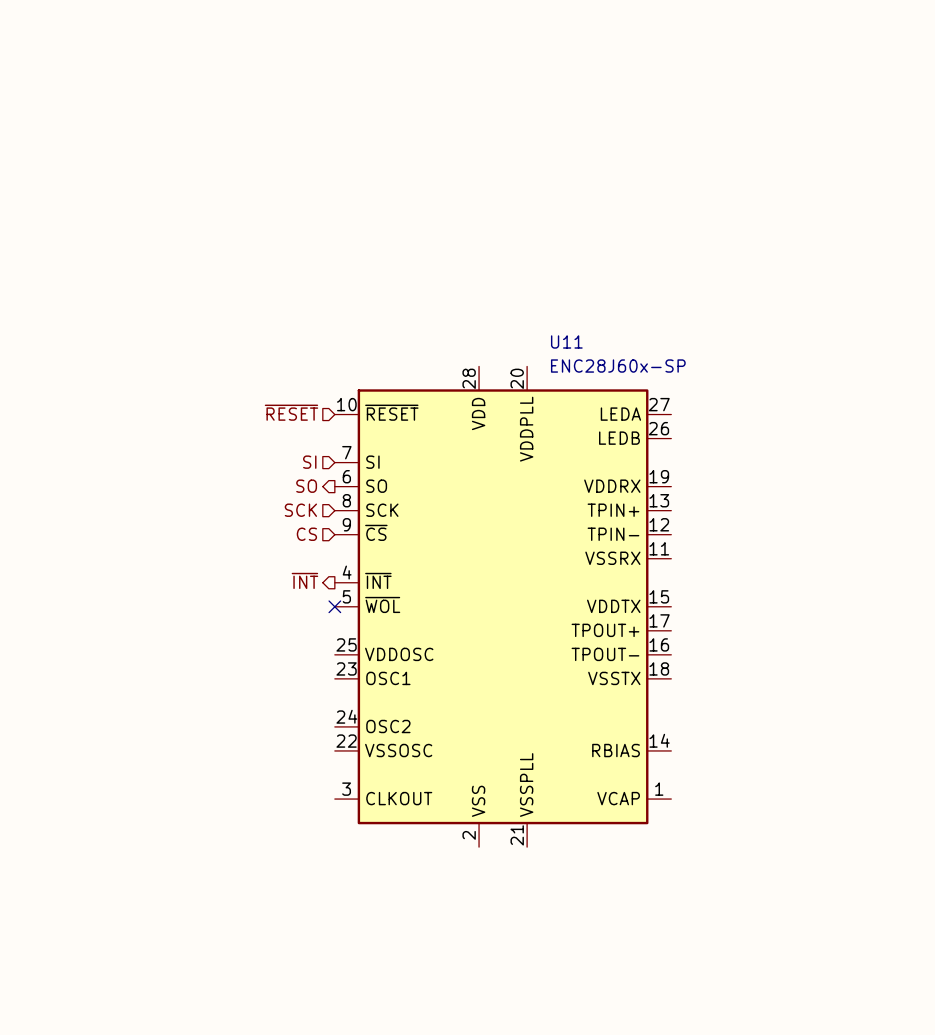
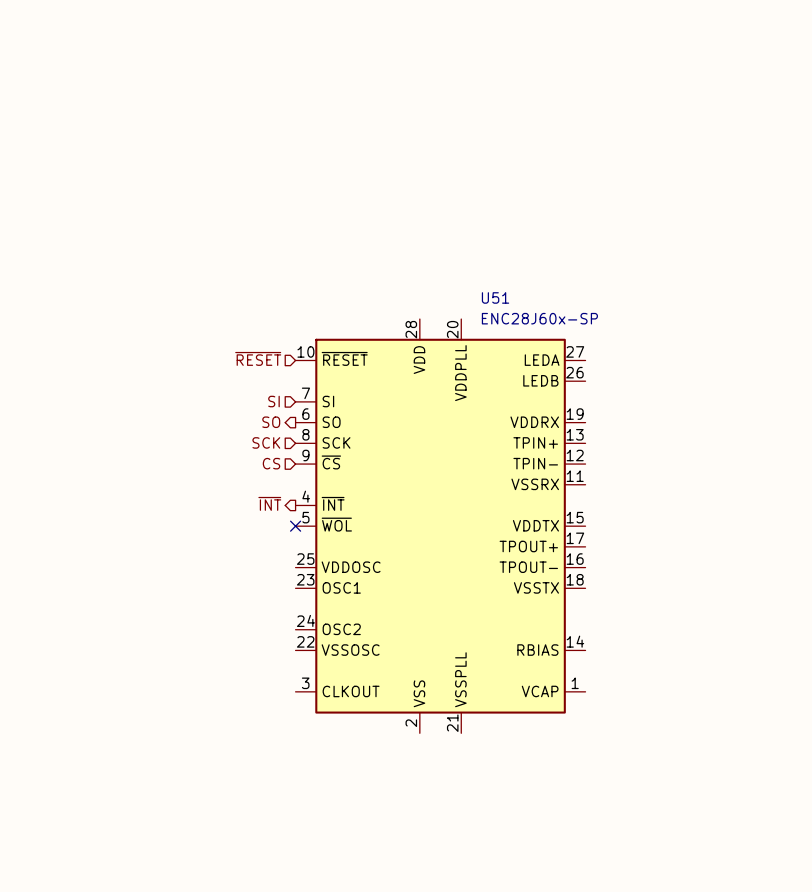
U11 name: U11 (566, 341) -> U51 (495, 297)

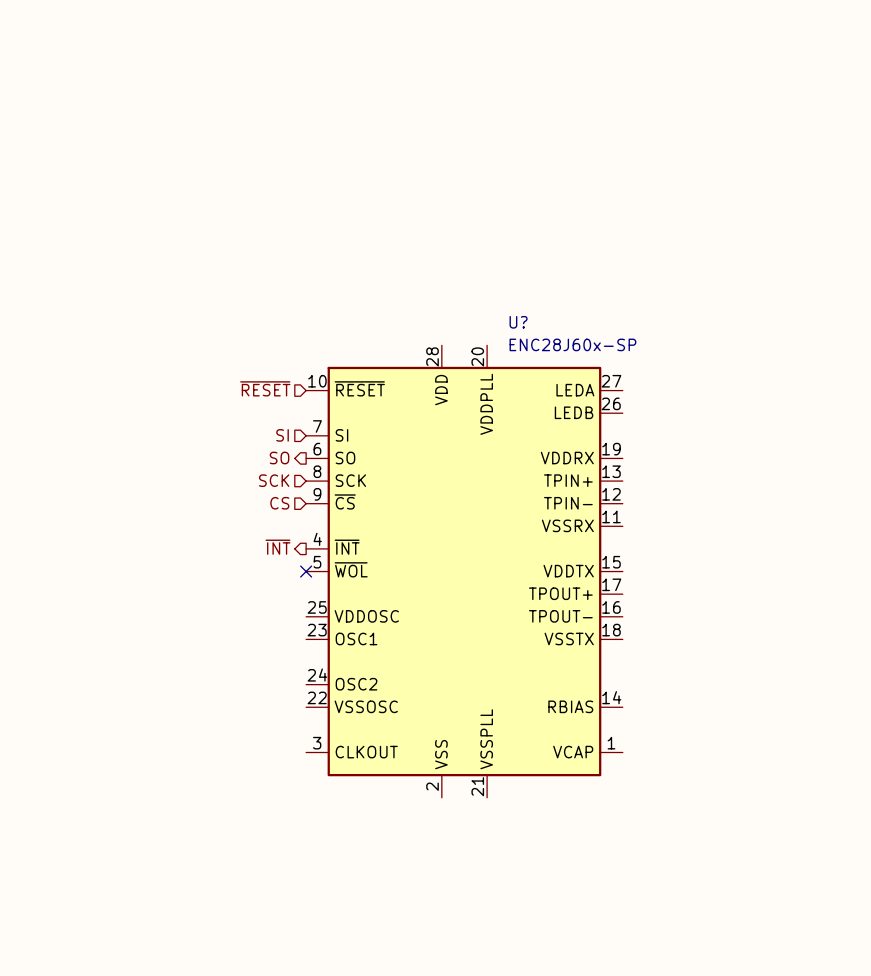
U51 name: U51 (495, 297) -> U? (518, 322)

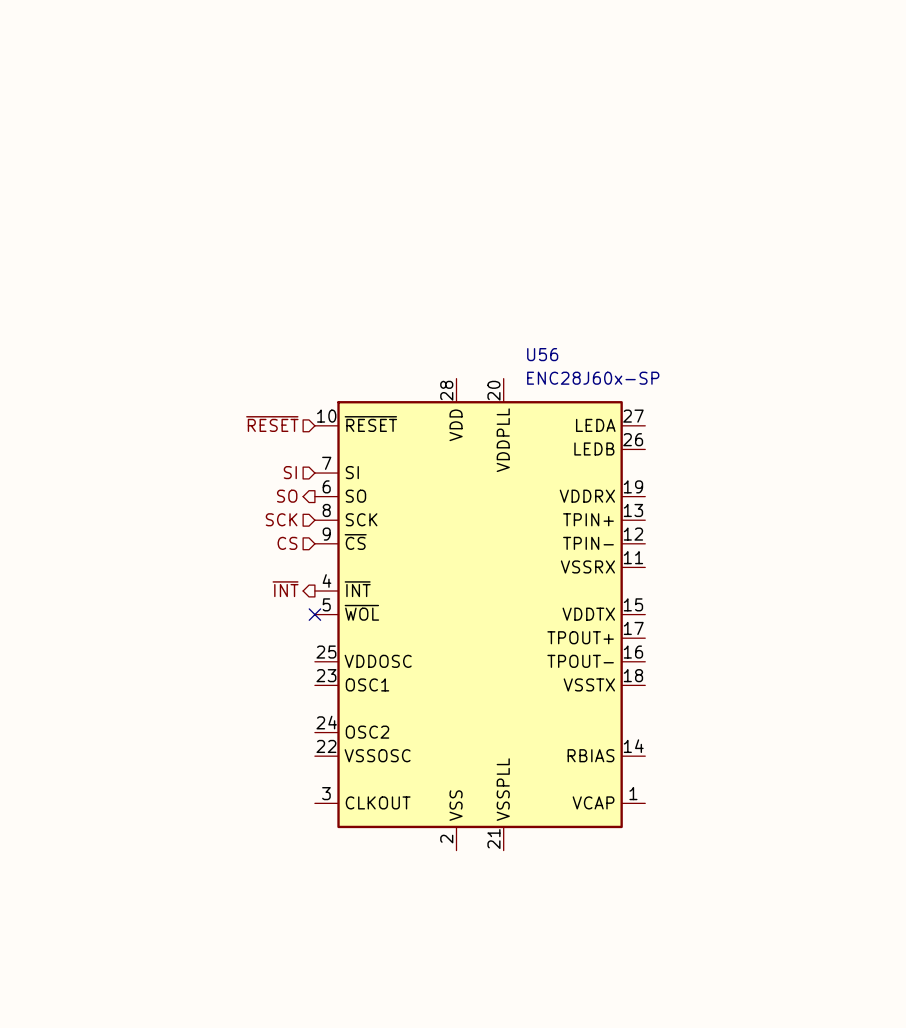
U? name: U? (518, 322) -> U56 (542, 354)

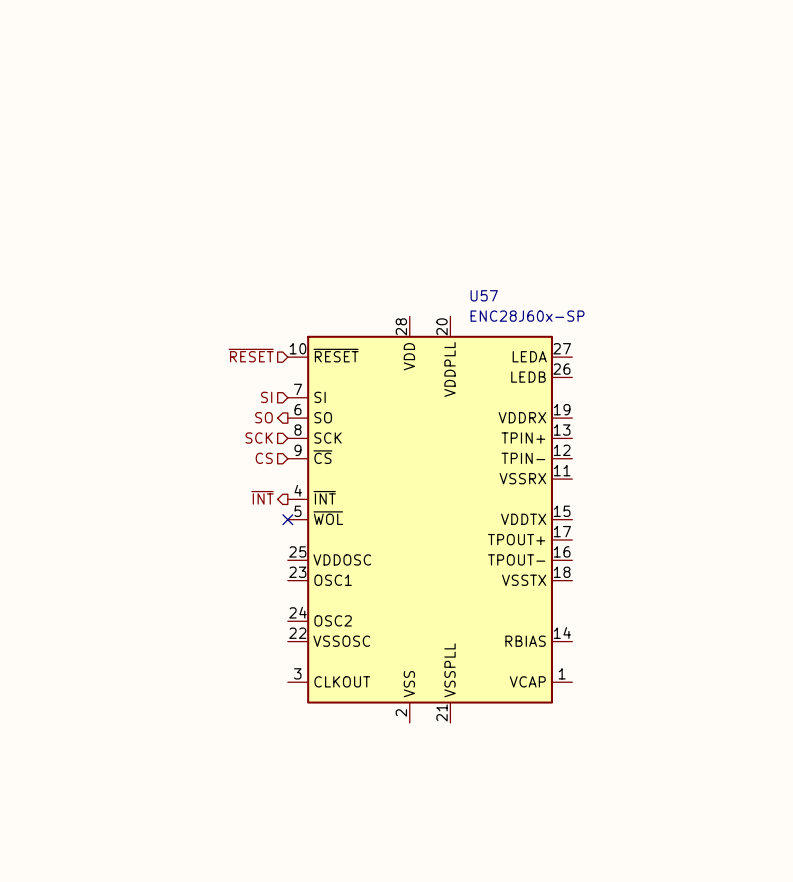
U56 name: U56 (542, 354) -> U57 (484, 295)

